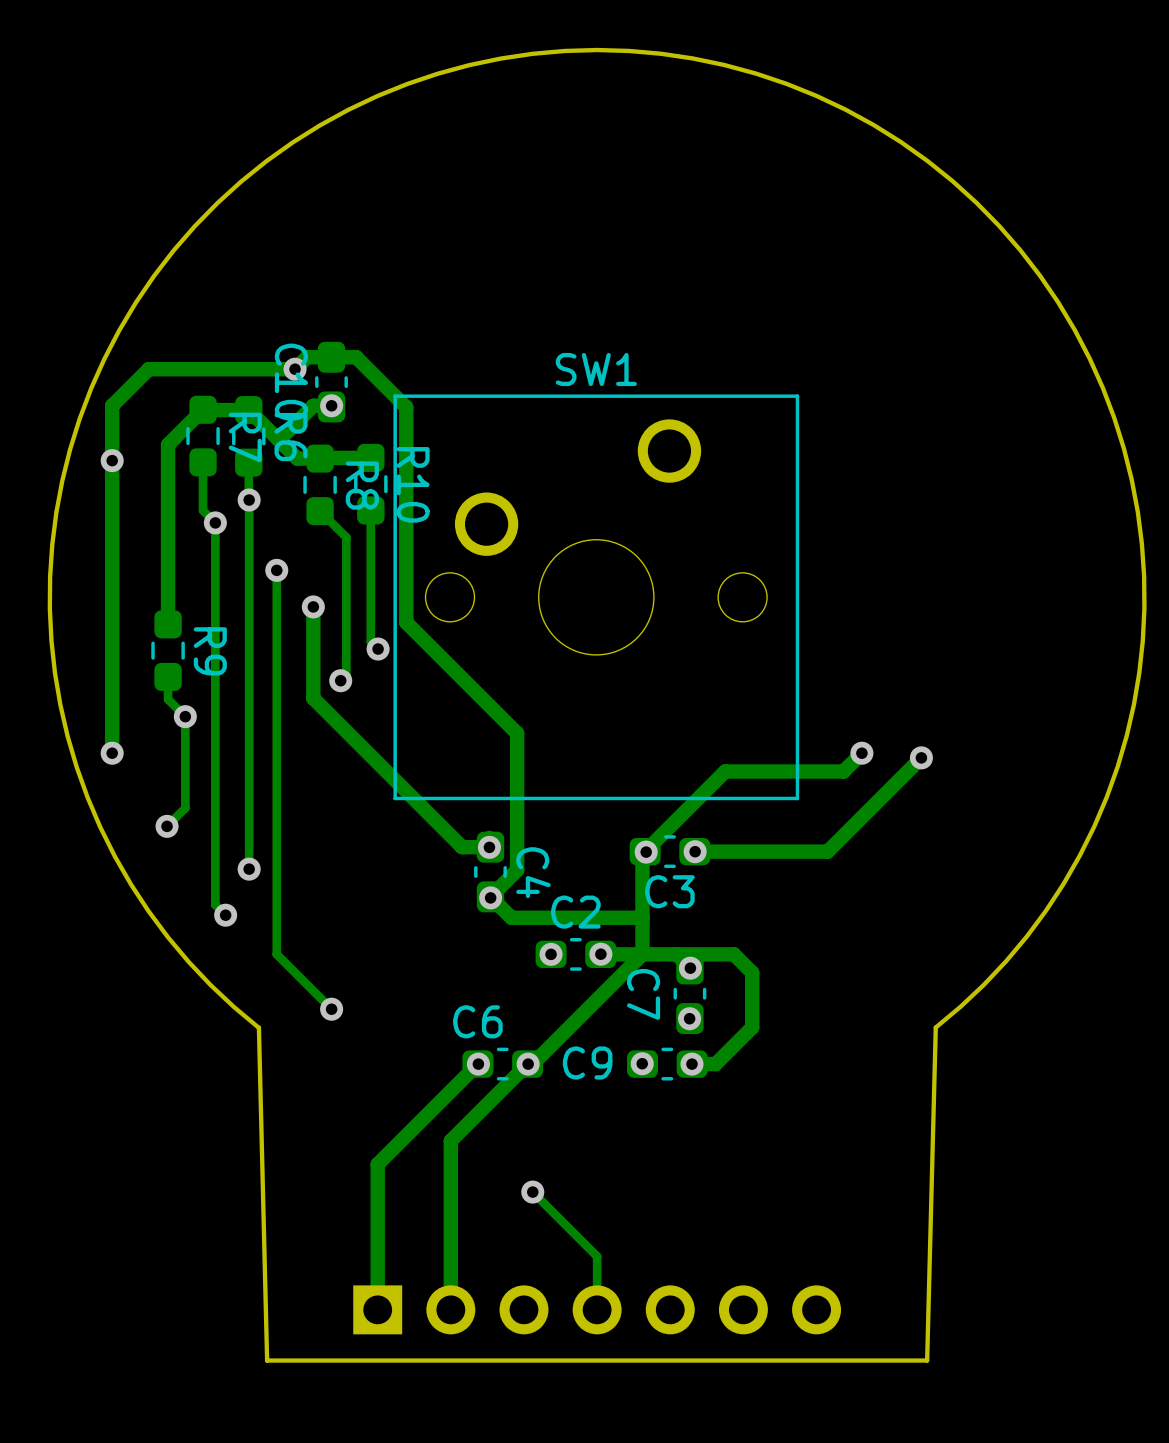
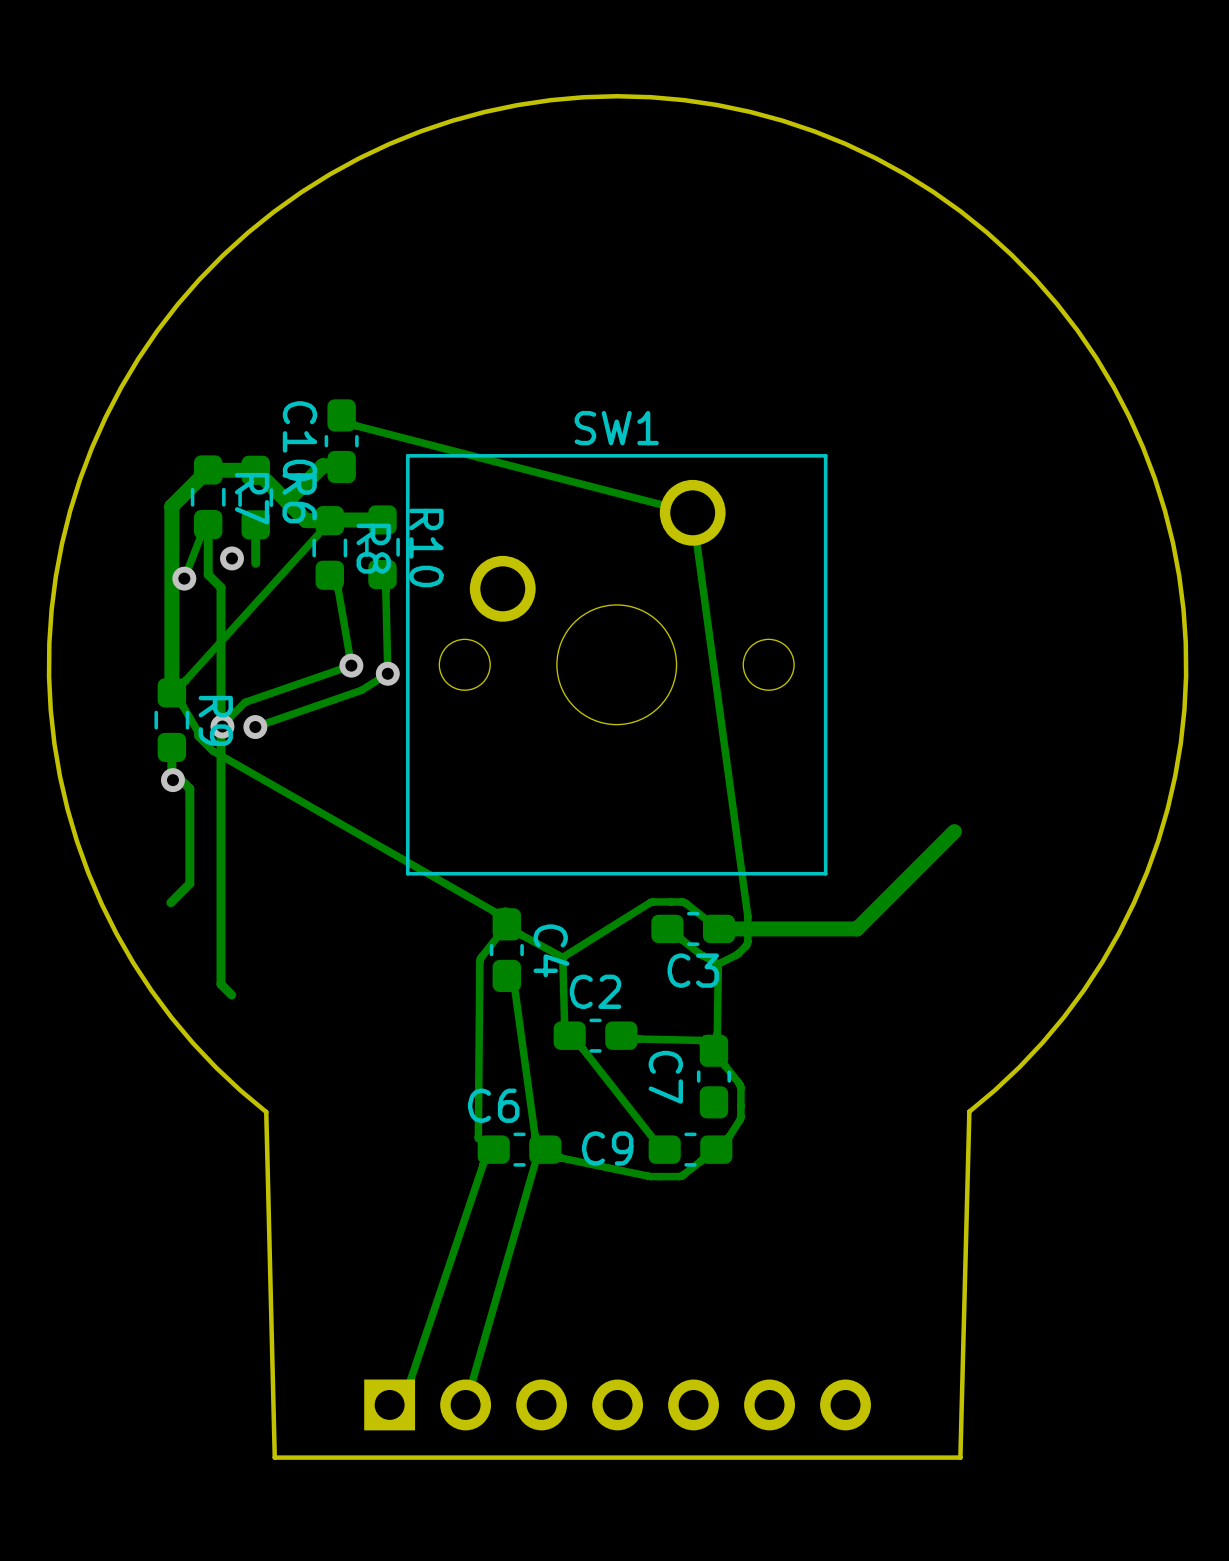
track: none -> (355, 425) (692, 512) (747, 916) (747, 944) (738, 953) (718, 964)
via: (295, 369) -> none
via: (331, 405) -> none
via: (112, 460) -> none
track: none -> (318, 534) (185, 680) (171, 692) (182, 706)
track: none -> (199, 539) (184, 578)
via: none -> (232, 558)
track: (249, 500) (249, 869) -> none
via: (249, 500) -> none
track: (370, 510) (370, 641) (378, 649) -> (382, 574) (385, 585) (387, 673) (361, 690) (255, 727)
track: (320, 511) (346, 537) (346, 675) (340, 680) -> (329, 575) (338, 589) (351, 665) (245, 702) (222, 726)
via: none -> (184, 578)
via: (215, 522) -> none
track: (276, 570) (276, 954) (331, 1009) -> none
via: (276, 570) -> none
via: none -> (387, 673)
track: (313, 606) (313, 698) (462, 847) (490, 847) -> none
via position: (313, 606) -> (351, 665)
track: none -> (183, 706) (197, 730) (198, 736) (212, 750) (493, 911) (520, 934) (562, 957)
via: (378, 649) -> none
via: none -> (222, 726)
via: none -> (255, 727)
via: (340, 680) -> none
via position: (185, 716) -> (172, 780)
track: (112, 753) (112, 405) (148, 369) (295, 369) (307, 357) (356, 357) (406, 407) (406, 622) (517, 733) (517, 870) (490, 896) (511, 917) (642, 917) -> none
via: (112, 753) -> none
track: (861, 753) (843, 771) (725, 771) (642, 854) (642, 954) (532, 1064) (527, 1064) (450, 1140) (450, 1309) -> (534, 1163) (465, 1404)
via: (861, 753) -> none
via: (921, 757) -> none
via: (167, 826) -> none
track: none -> (704, 917) (684, 902) (650, 902) (562, 957)
via: (489, 847) -> none
via: (695, 851) -> none
via: (646, 852) -> none
track: none -> (495, 939) (479, 961) (478, 1138) (493, 1149) (483, 1163)
track: none -> (682, 940) (702, 955) (718, 964)
via: (249, 869) -> none
track: none -> (562, 957) (564, 1025) (569, 1035) (582, 1048)
track: none -> (718, 964) (717, 1038) (713, 1050)
via: (490, 897) -> none
track: none -> (515, 992) (534, 1135)
via: (225, 915) -> none
via: (551, 954) -> none
track: (600, 954) (733, 954) (752, 972) (752, 1027) (715, 1064) (692, 1064) -> (621, 1035) (633, 1039) (700, 1040) (713, 1050)
via: (600, 954) -> none
track: none -> (582, 1048) (651, 1136)
via: (690, 968) -> none
track: none -> (725, 1065) (740, 1088) (740, 1119) (729, 1136)
via: (331, 1009) -> none
via: (689, 1018) -> none
via: (642, 1063) -> none
track: (477, 1064) (377, 1164) (377, 1309) -> (483, 1163) (411, 1377) (411, 1383) (389, 1404)
via: (478, 1064) -> none
via: (528, 1064) -> none
via: (691, 1064) -> none
track: none -> (561, 1158) (650, 1176) (681, 1176) (701, 1160)
track: (532, 1192) (597, 1256) (597, 1309) -> none
via: (532, 1192) -> none

